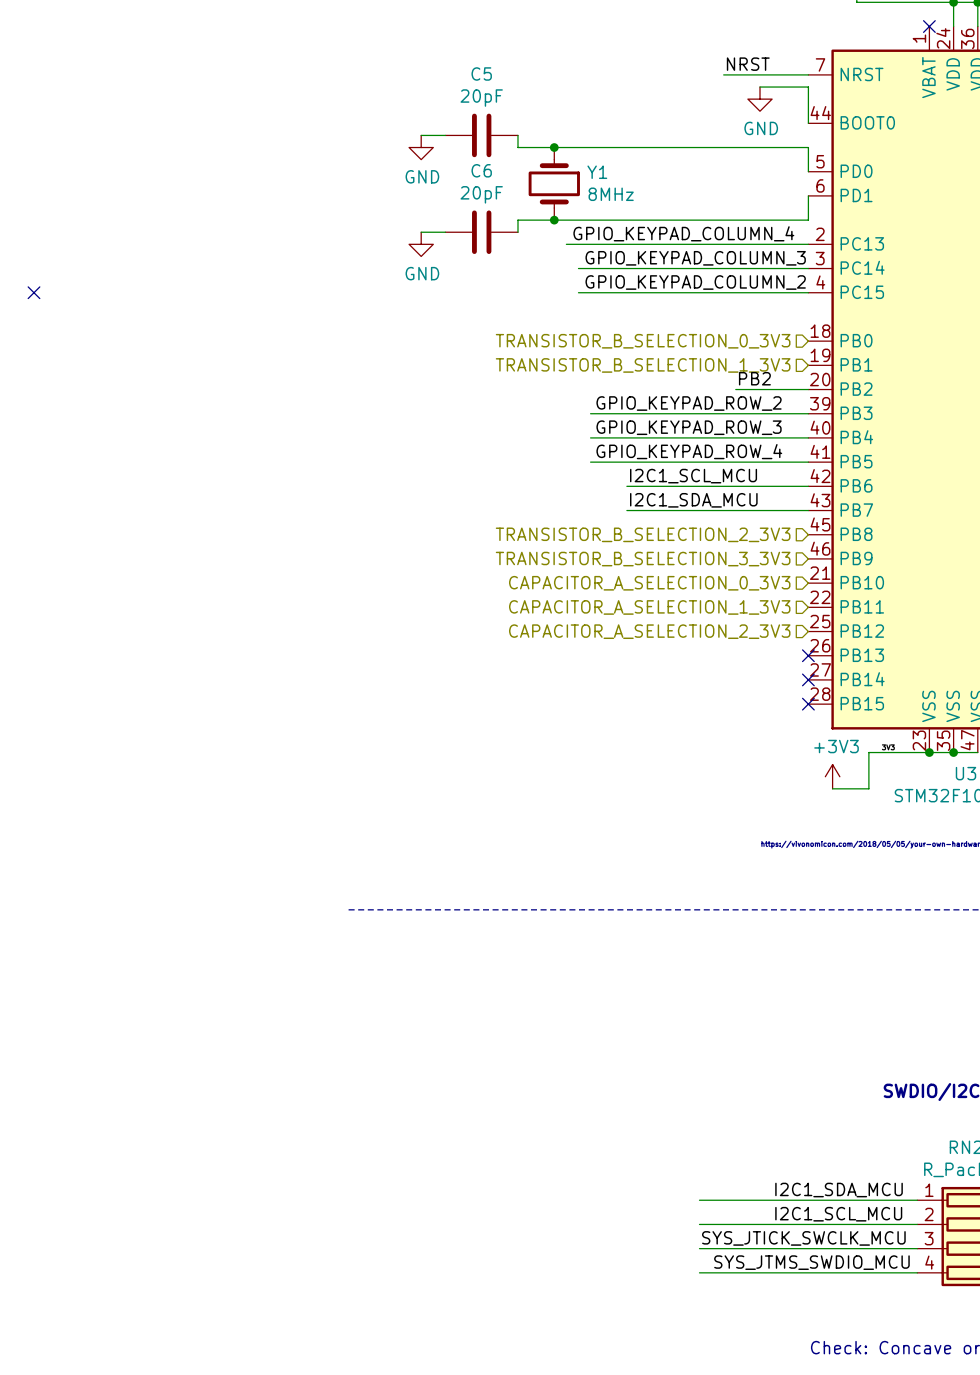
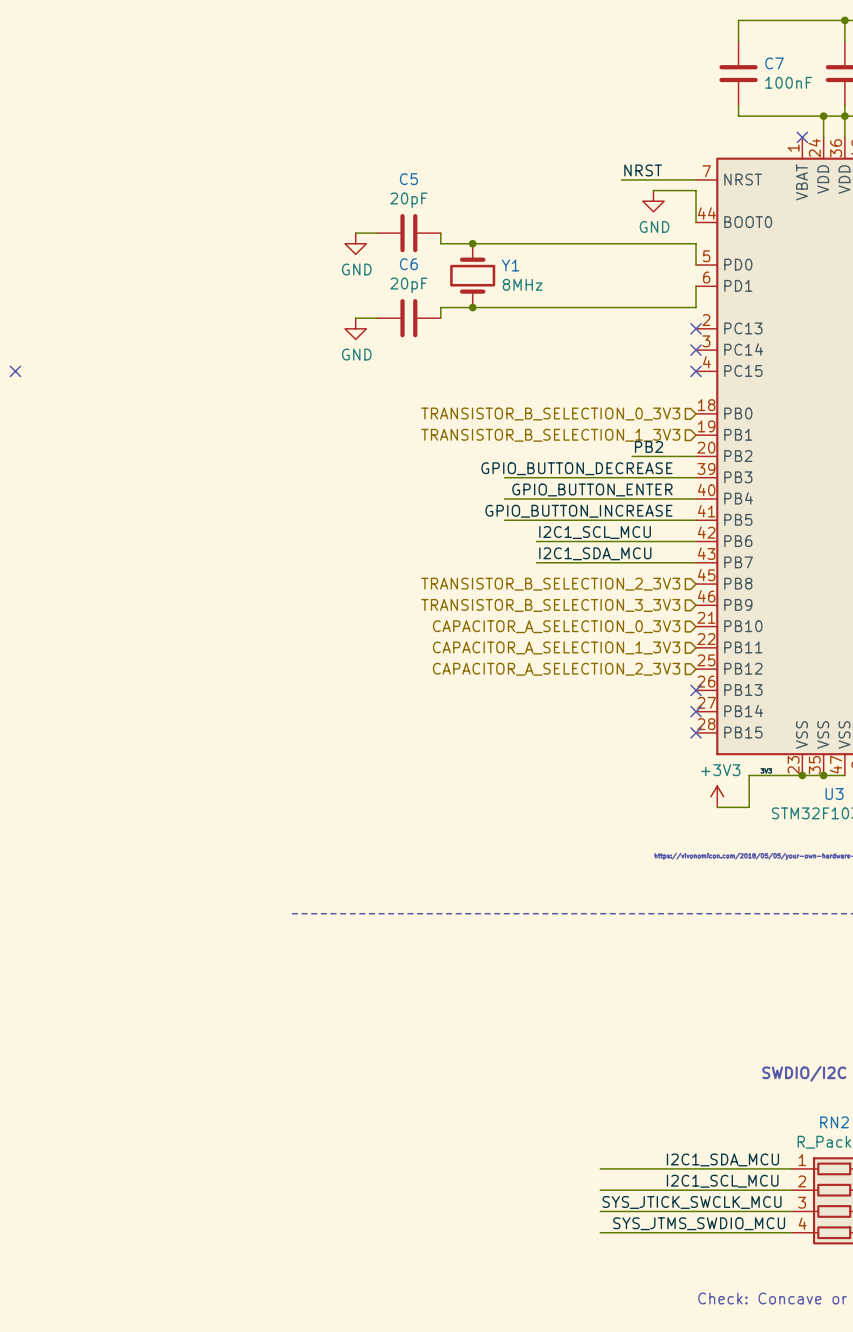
label: GPIO_KEYPAD_COLUMN_4 (683, 233) -> none
wire: (566, 244) (808, 244) -> none
no-connect mark: none -> (696, 328)
label: GPIO_KEYPAD_COLUMN_3 (695, 258) -> none
wire: (578, 268) (808, 268) -> none
no-connect mark: none -> (696, 350)
label: GPIO_KEYPAD_COLUMN_2 (695, 282) -> none
wire: (578, 292) (808, 292) -> none
no-connect mark: none -> (696, 371)
label: GPIO_KEYPAD_ROW_2 (689, 403) -> GPIO_BUTTON_DECREASE (576, 468)
label: GPIO_KEYPAD_ROW_3 (689, 427) -> GPIO_BUTTON_ENTER (592, 489)
label: GPIO_KEYPAD_ROW_4 (689, 451) -> GPIO_BUTTON_INCREASE (578, 511)

